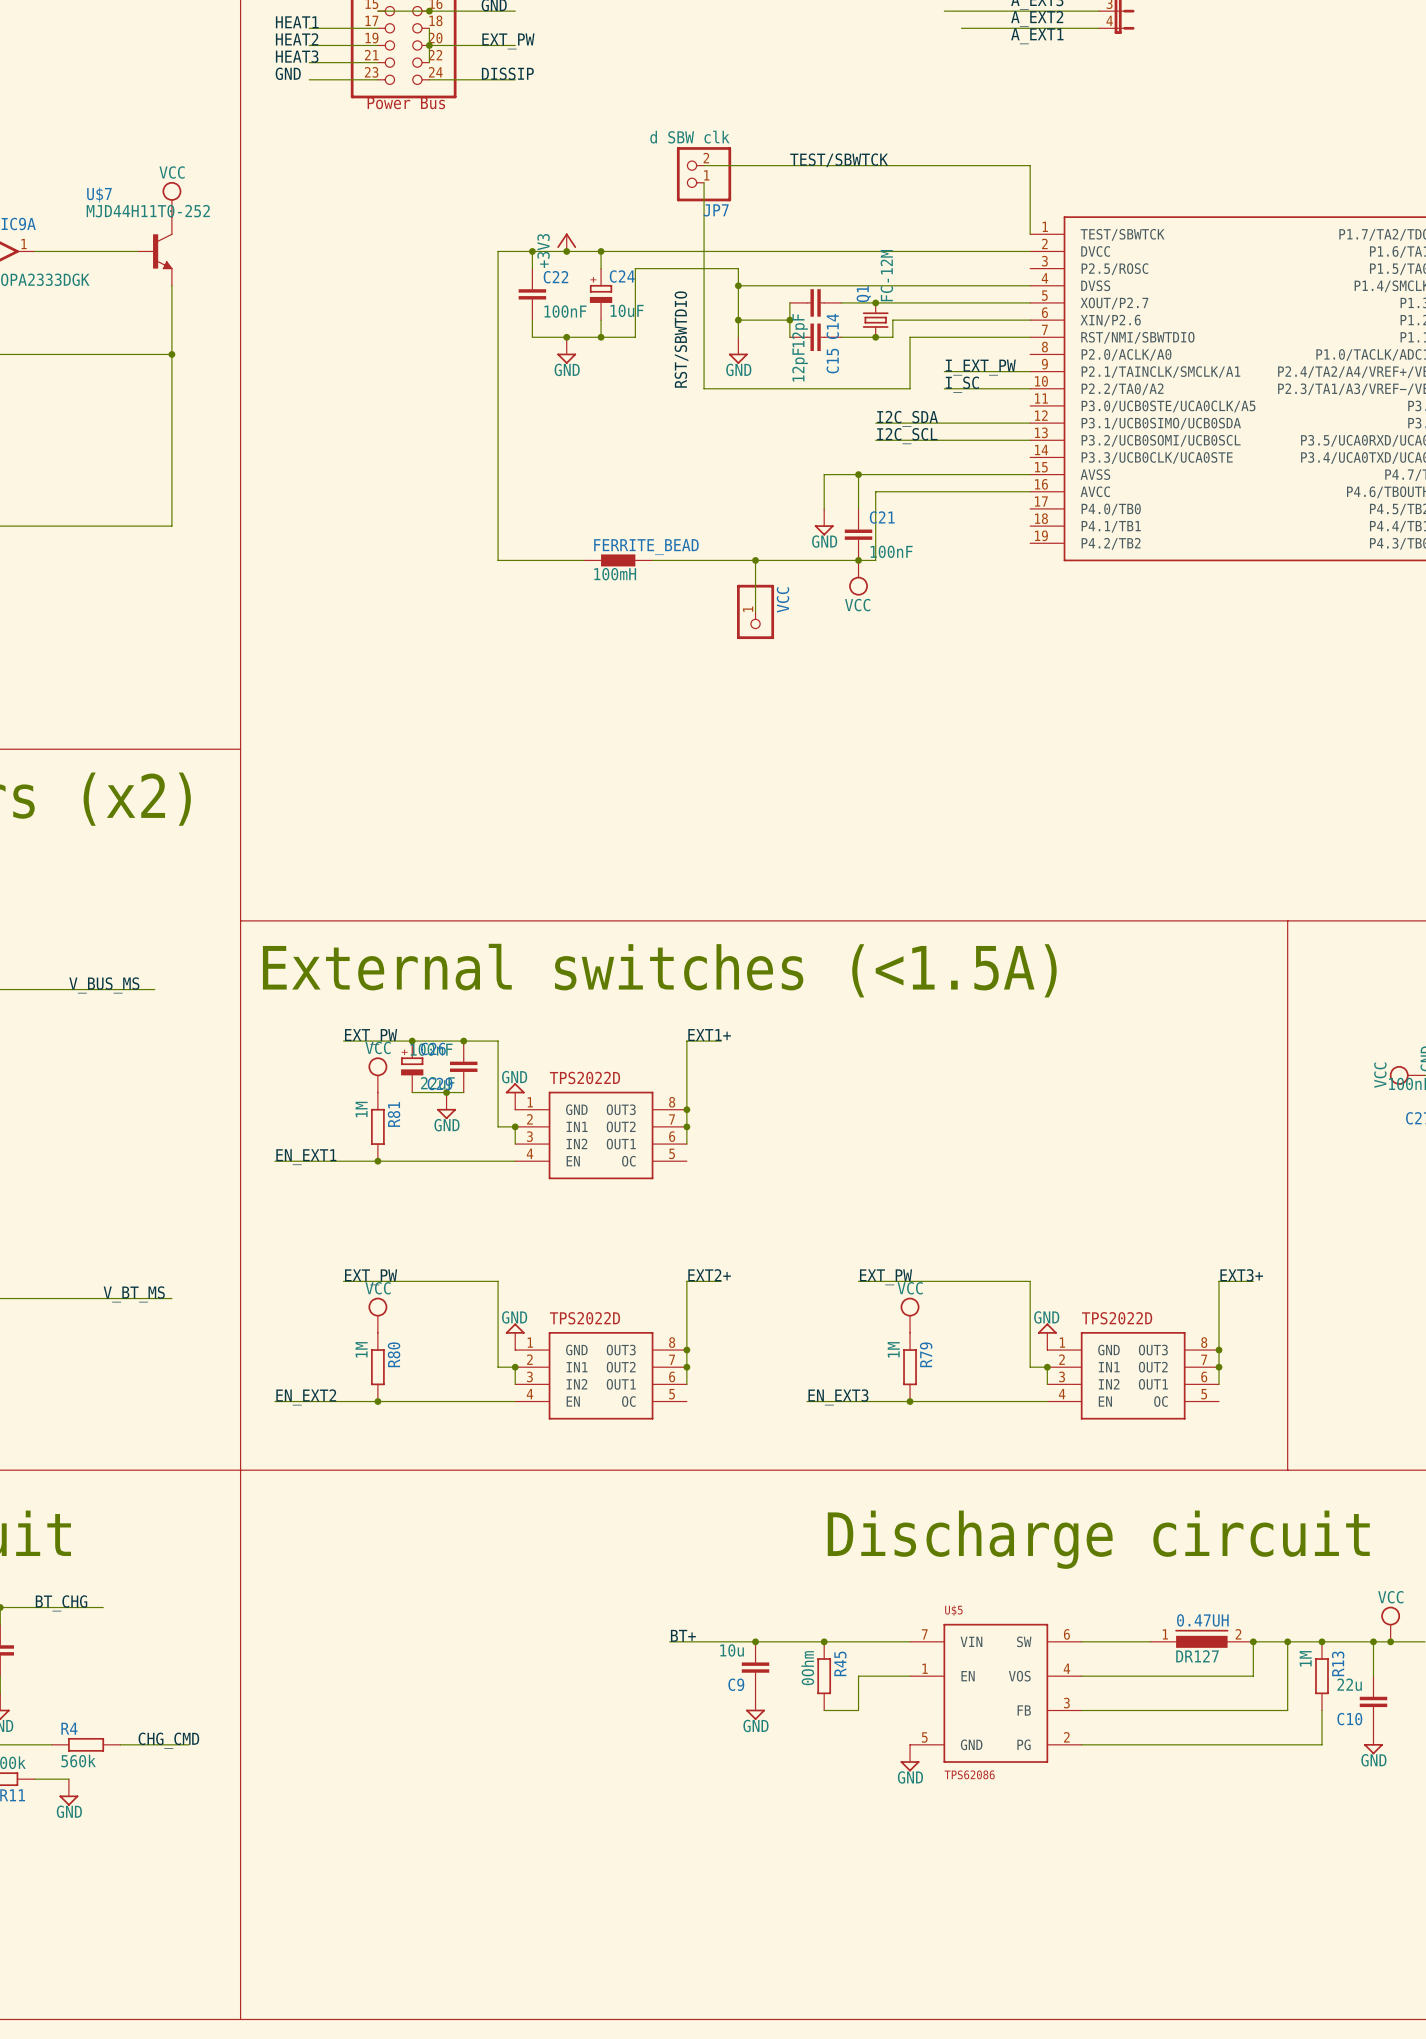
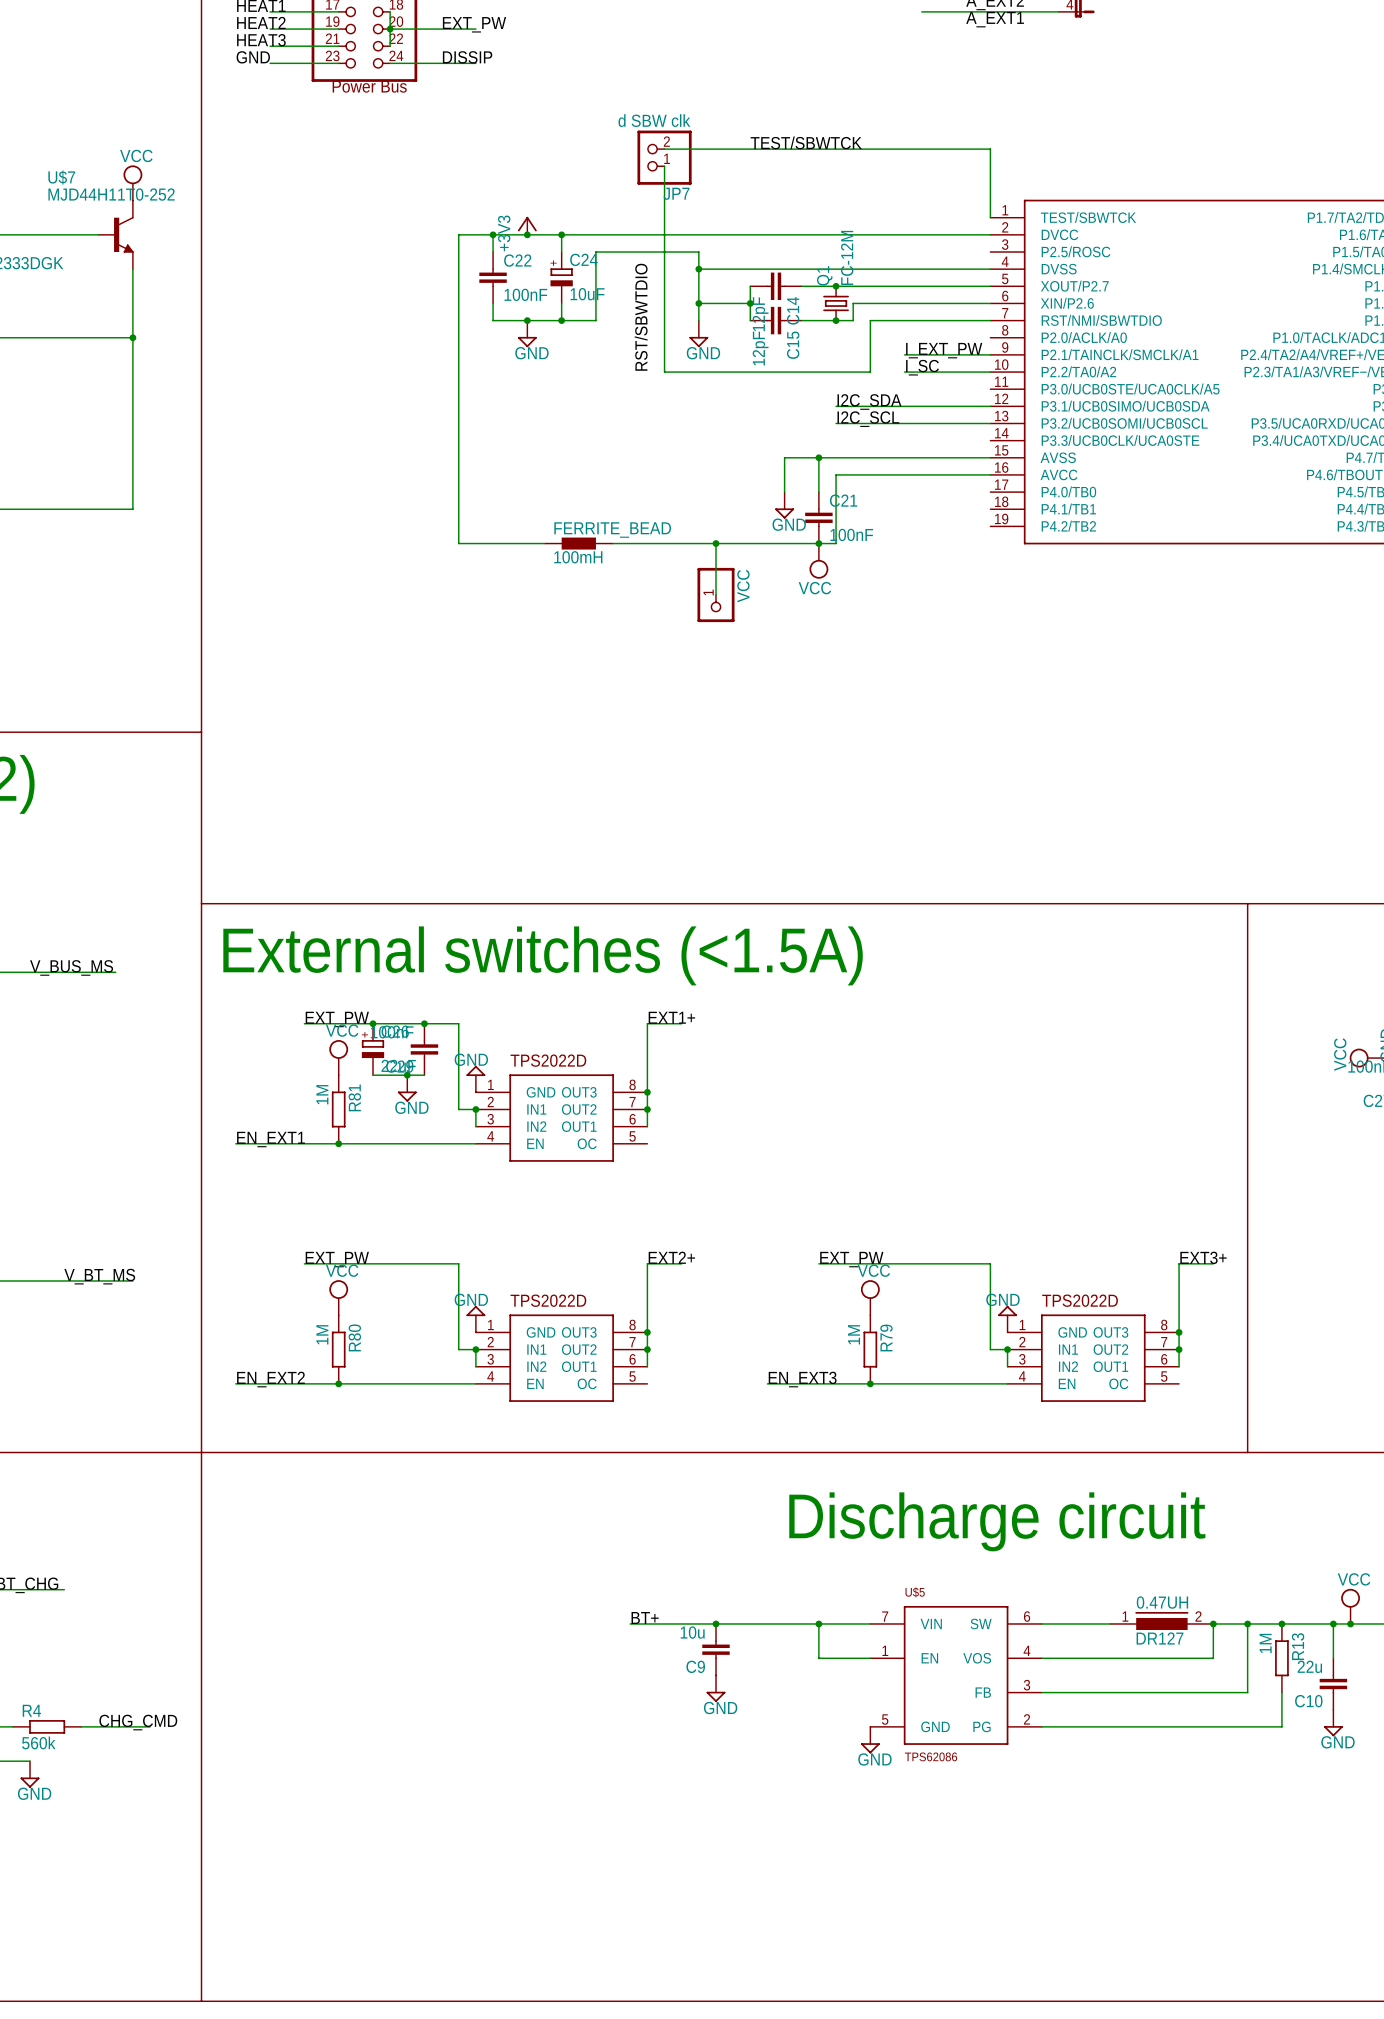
junction position: (824, 1641) -> (818, 1623)
R45: 0Ohm (824, 1676) -> none
wire: (858, 1676) (858, 1710) (824, 1710) -> (818, 1658) (818, 1623)

